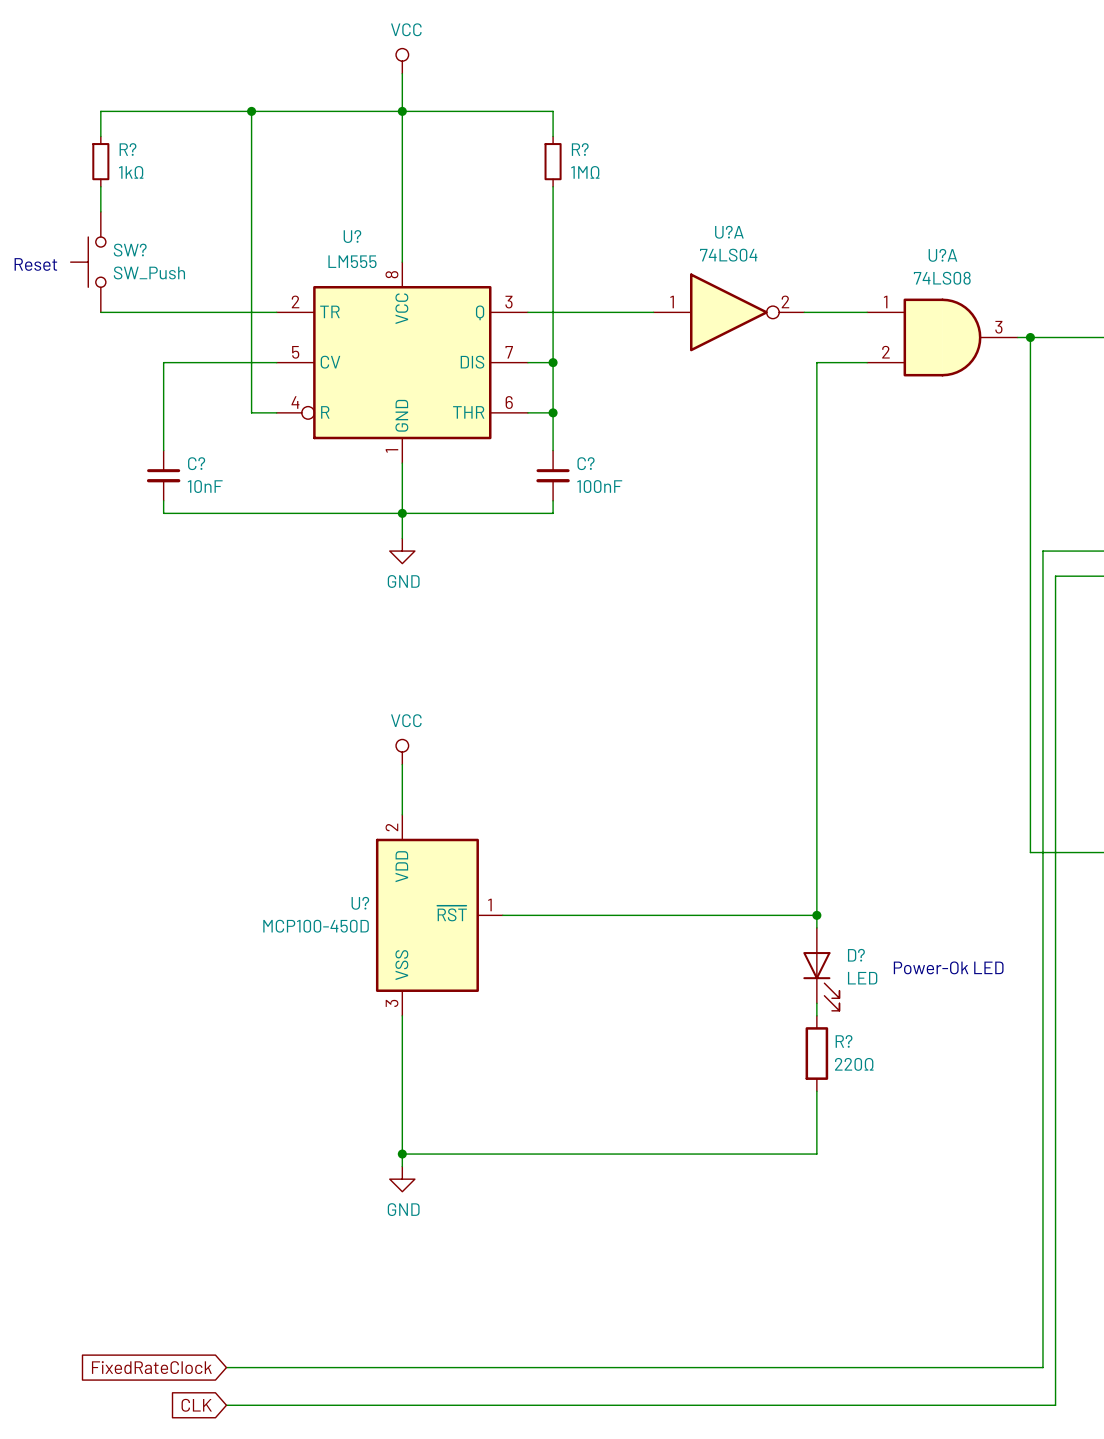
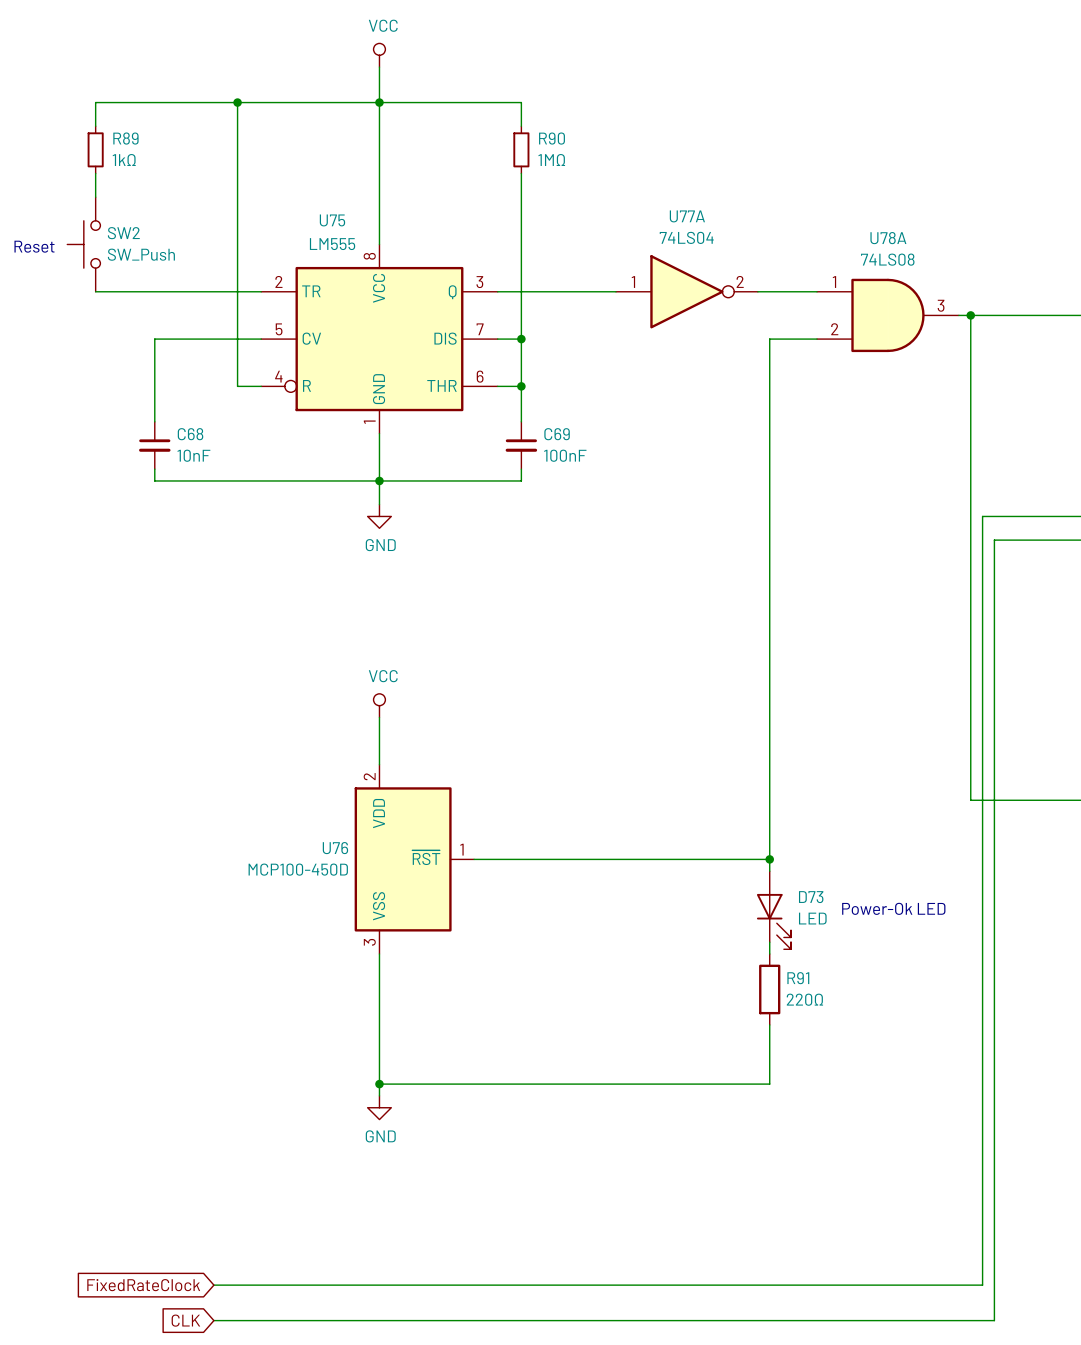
R? name: R? (128, 149) -> R89 (125, 138)
R? name: R? (580, 149) -> R90 (552, 138)
U?A name: U?A (729, 232) -> U77A (687, 216)
U? name: U? (352, 236) -> U75 (332, 220)
SW? name: SW? (130, 250) -> SW2 (123, 233)
U?A name: U?A (942, 255) -> U78A (888, 238)
C? name: C? (196, 463) -> C68 (190, 434)
C? name: C? (586, 463) -> C69 (557, 434)
U? name: U? (360, 903) -> U76 (335, 848)
D? name: D? (856, 955) -> D73 (811, 897)
R? name: R? (844, 1041) -> R91 (798, 978)

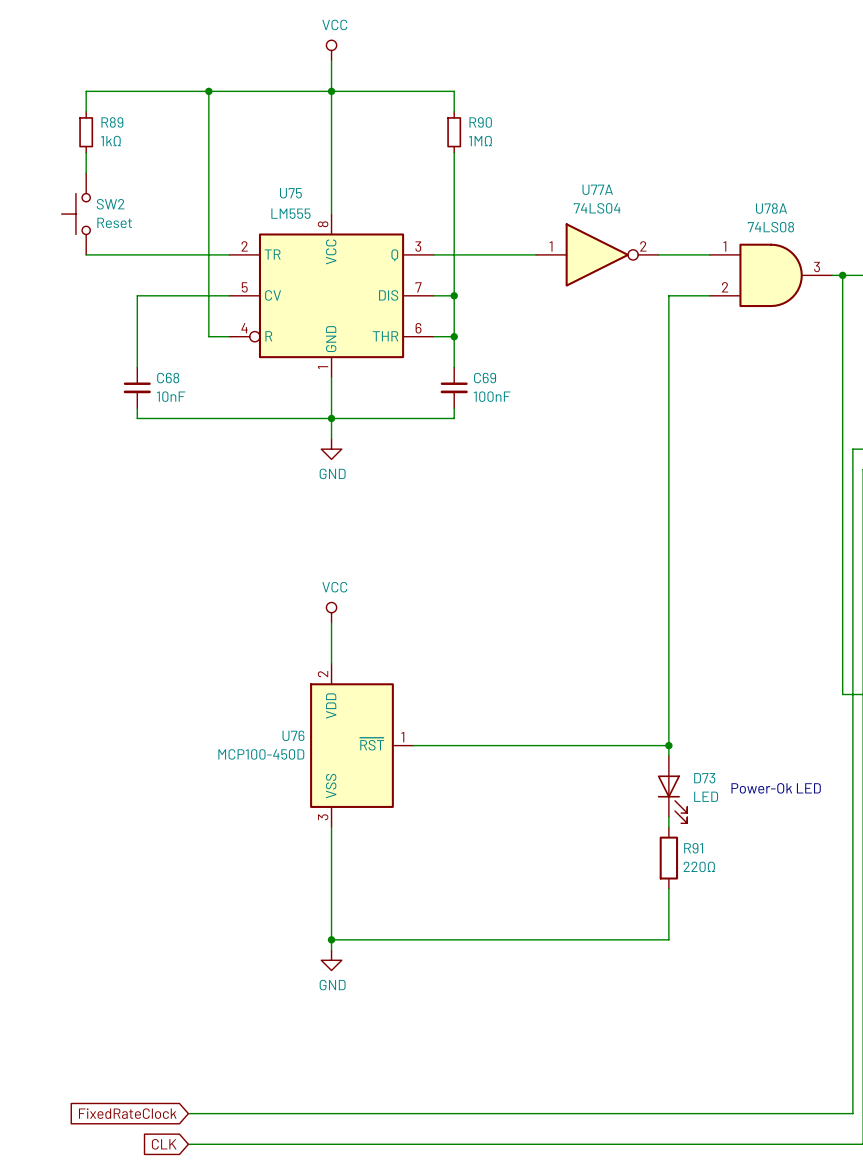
text: Reset (34, 246) -> none
SW2 value: SW_Push (141, 254) -> Reset (114, 222)

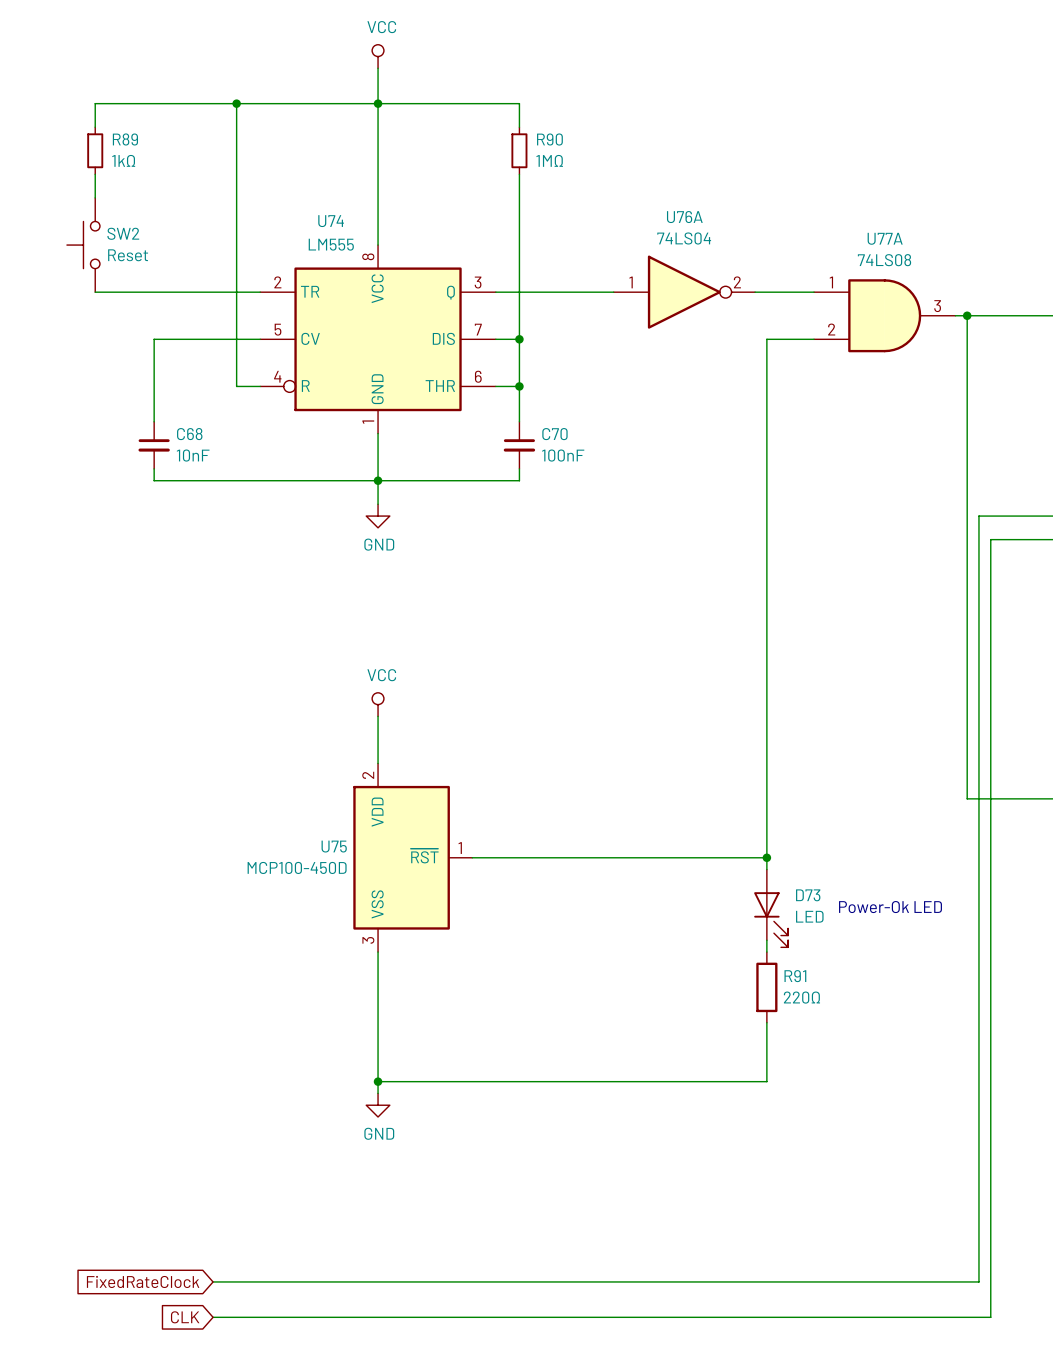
U77A name: U77A (597, 189) -> U76A (684, 217)
U75 name: U75 (290, 193) -> U74 (331, 221)
U78A name: U78A (771, 208) -> U77A (885, 238)
C69 name: C69 (485, 378) -> C70 (554, 434)
U76 name: U76 (293, 735) -> U75 (334, 846)

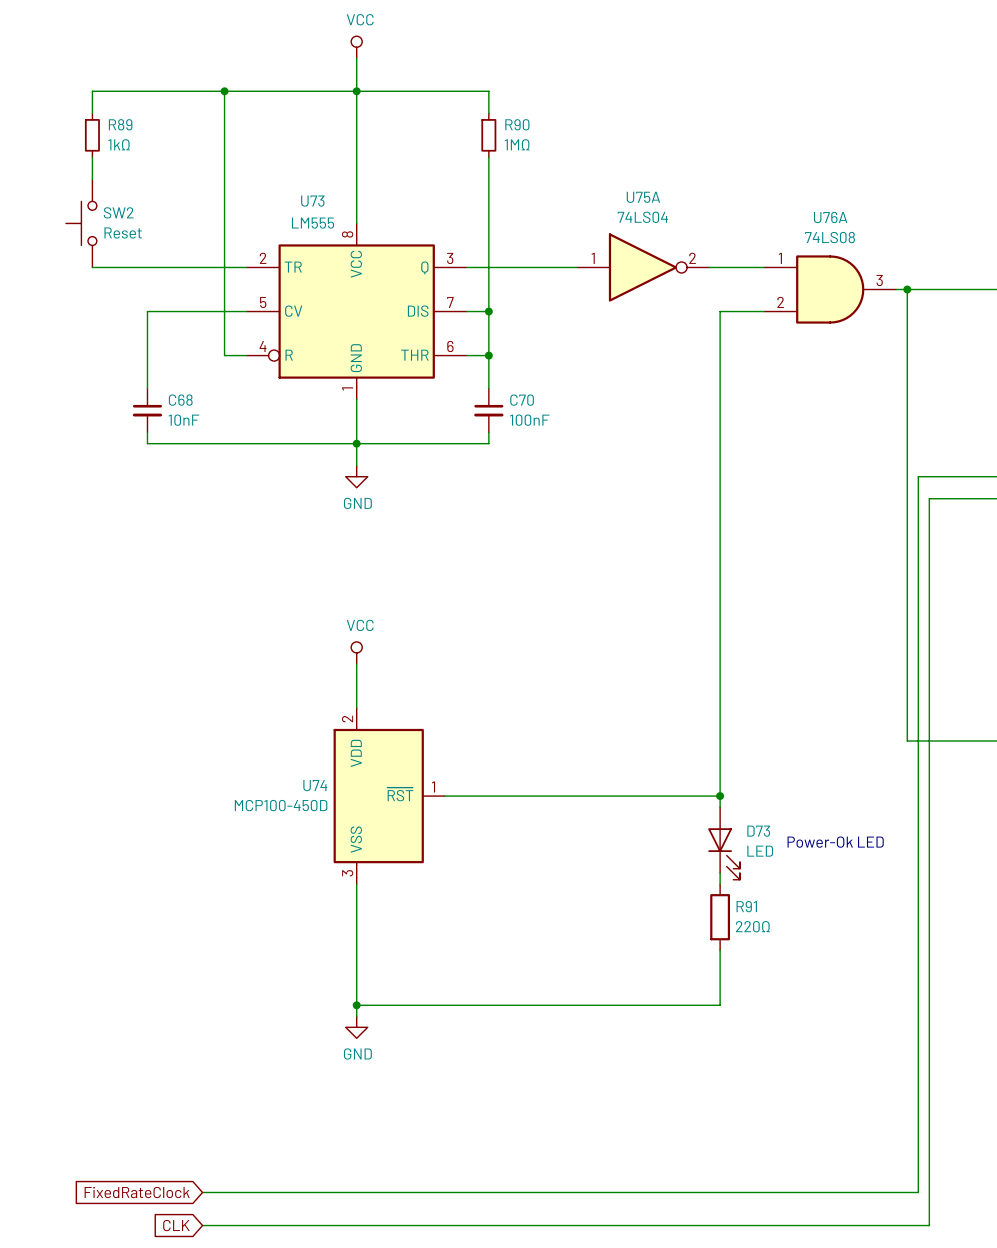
U76A name: U76A (684, 217) -> U75A (643, 197)
U74 name: U74 (331, 221) -> U73 (312, 201)
U77A name: U77A (885, 238) -> U76A (830, 217)
U75 name: U75 (334, 846) -> U74 (315, 785)

